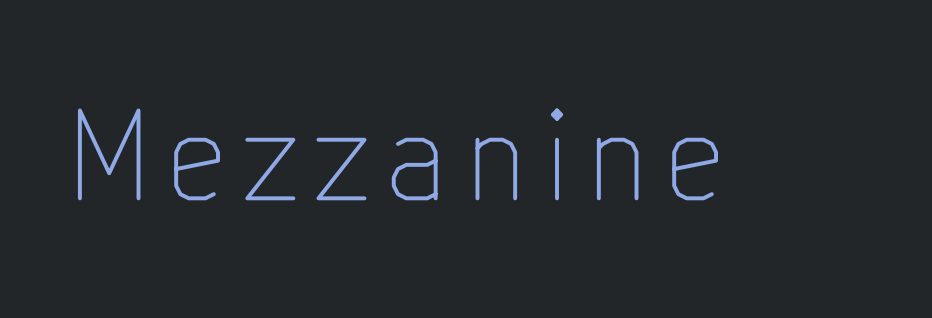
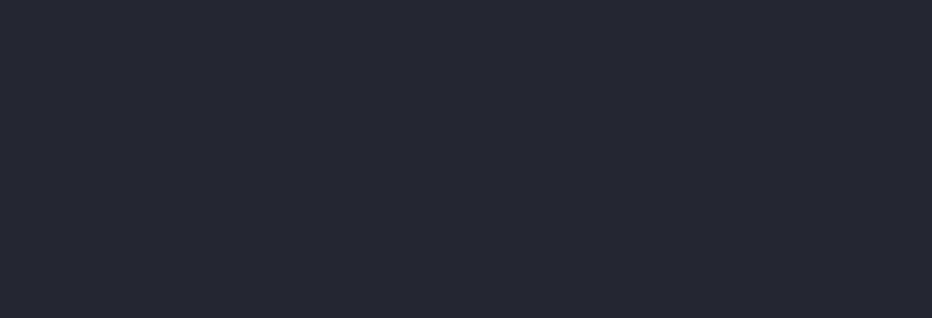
text: Mezzanine (397, 154) -> none

